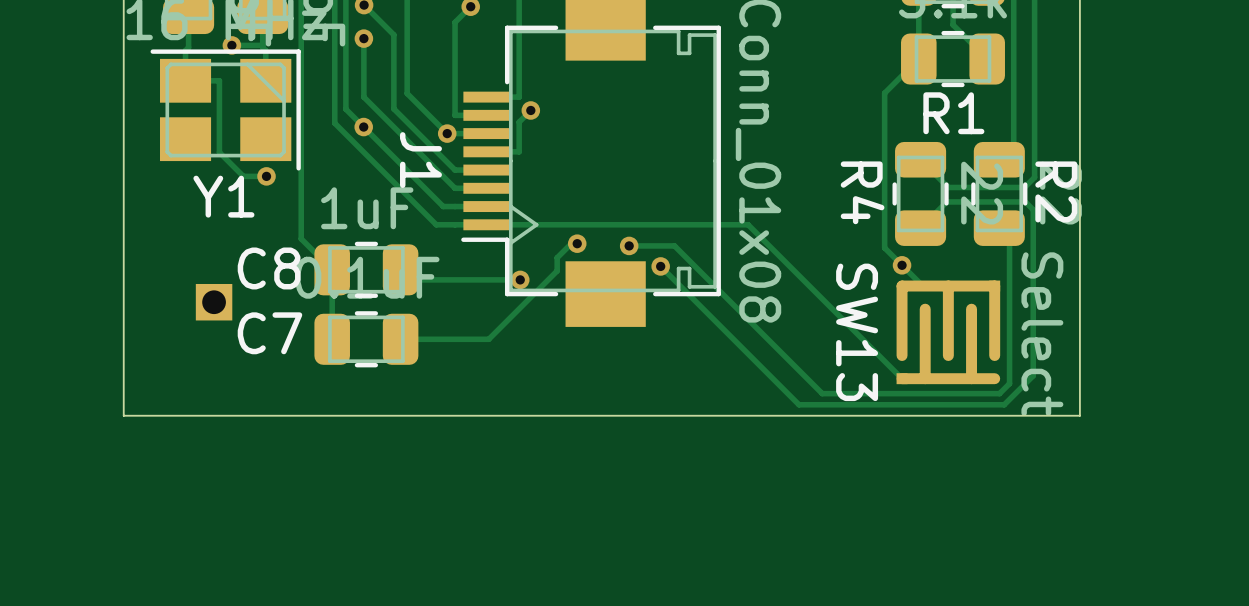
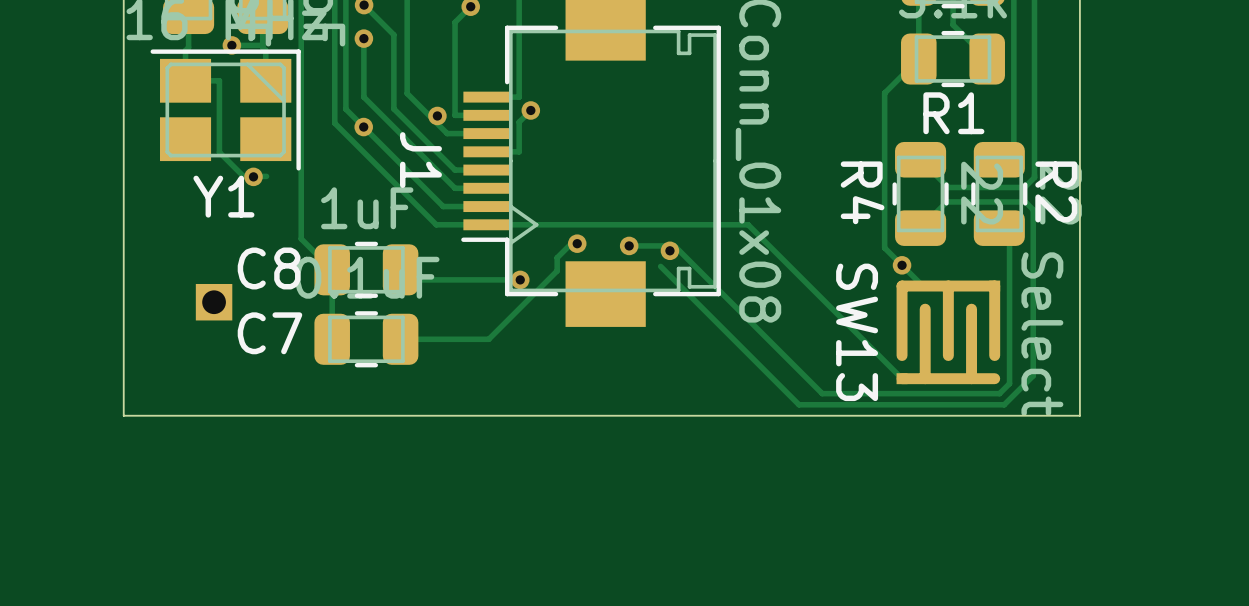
via position: (447, 133) -> (437, 115)
via position: (266, 176) -> (253, 176)
via position: (660, 266) -> (669, 250)

